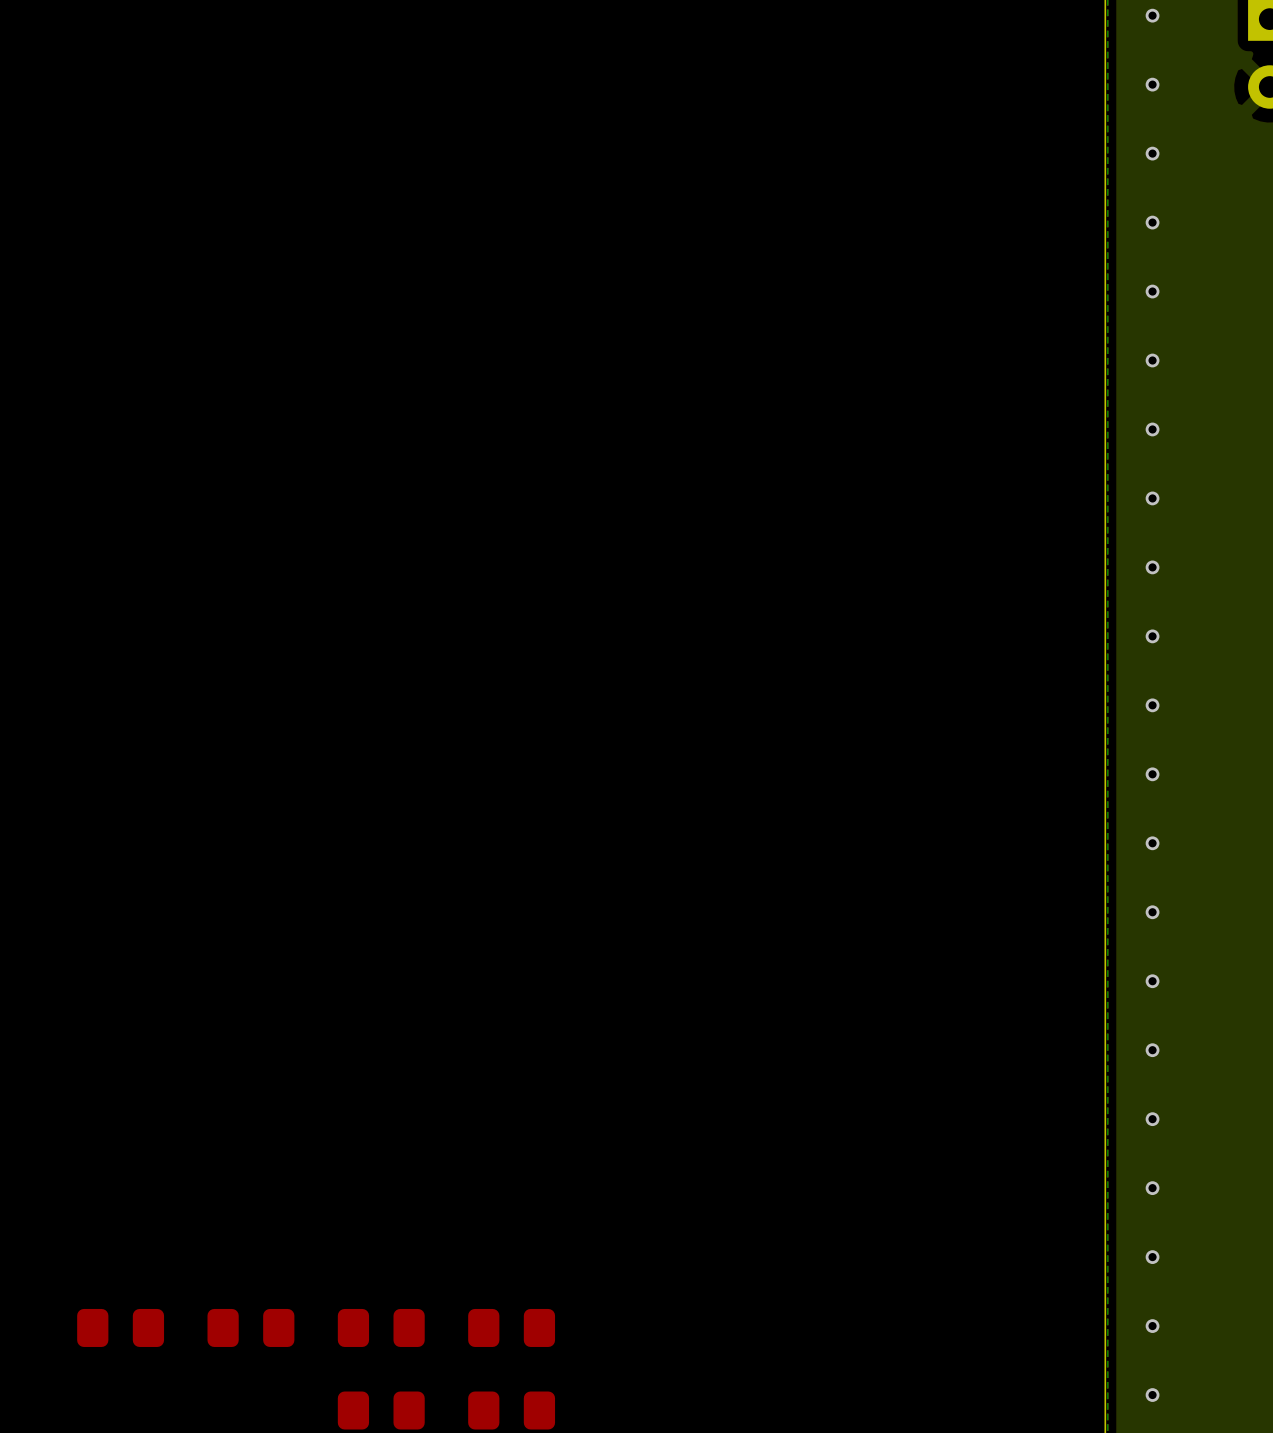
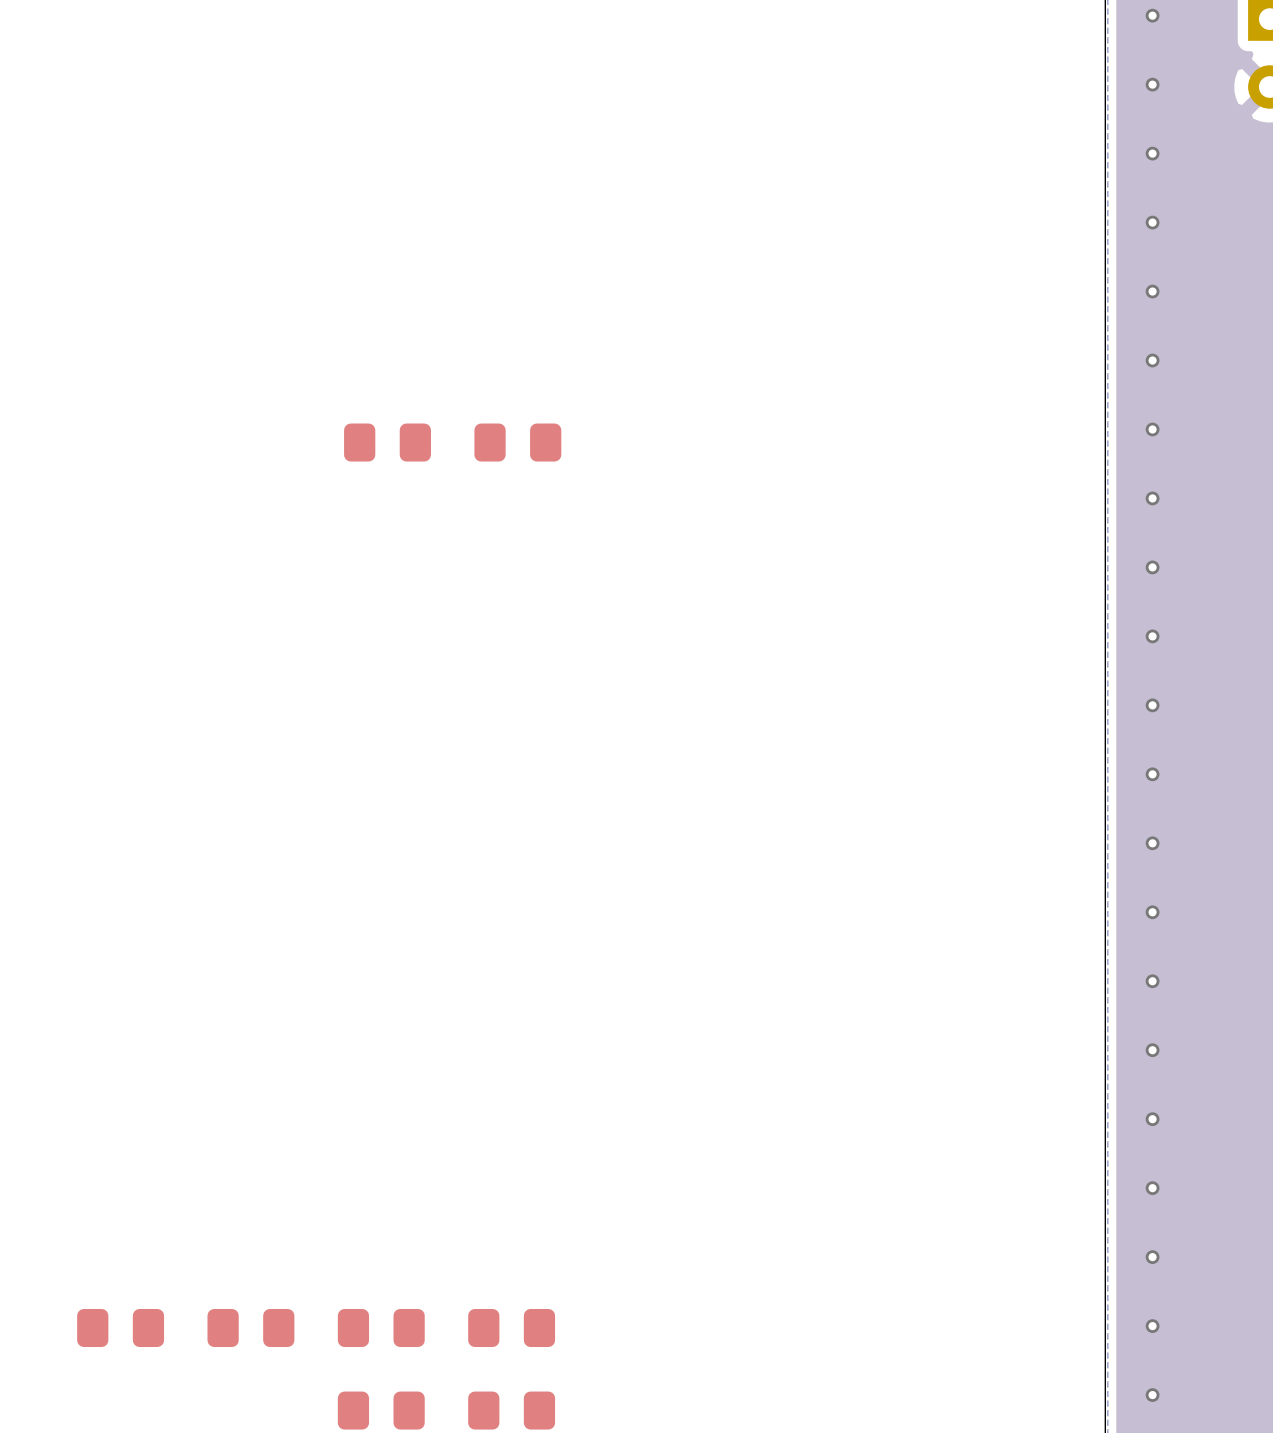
part: none -> (387, 442)
part: none -> (517, 442)

